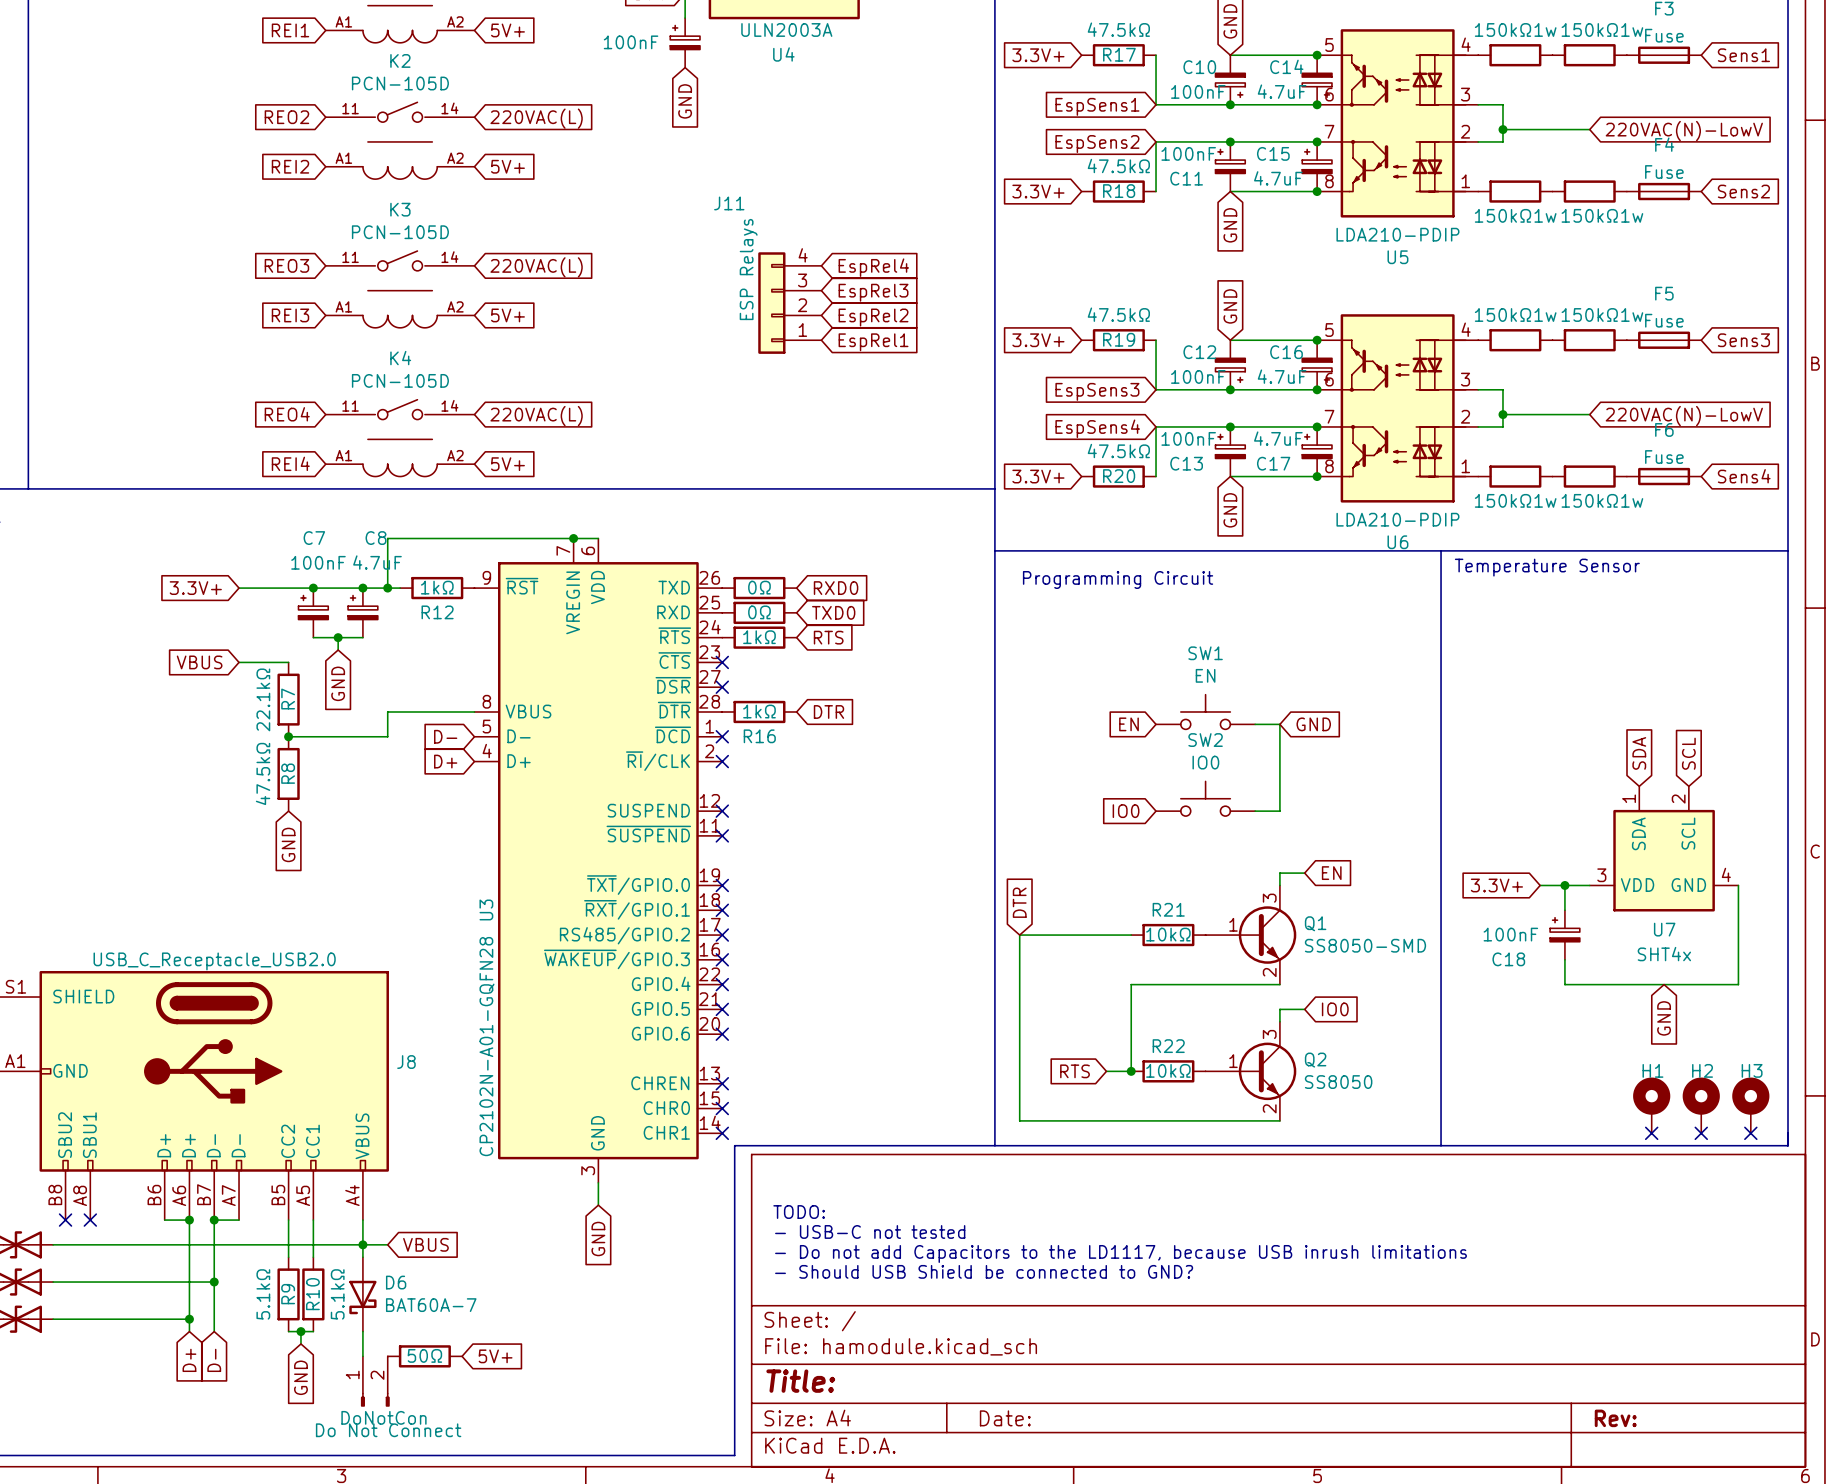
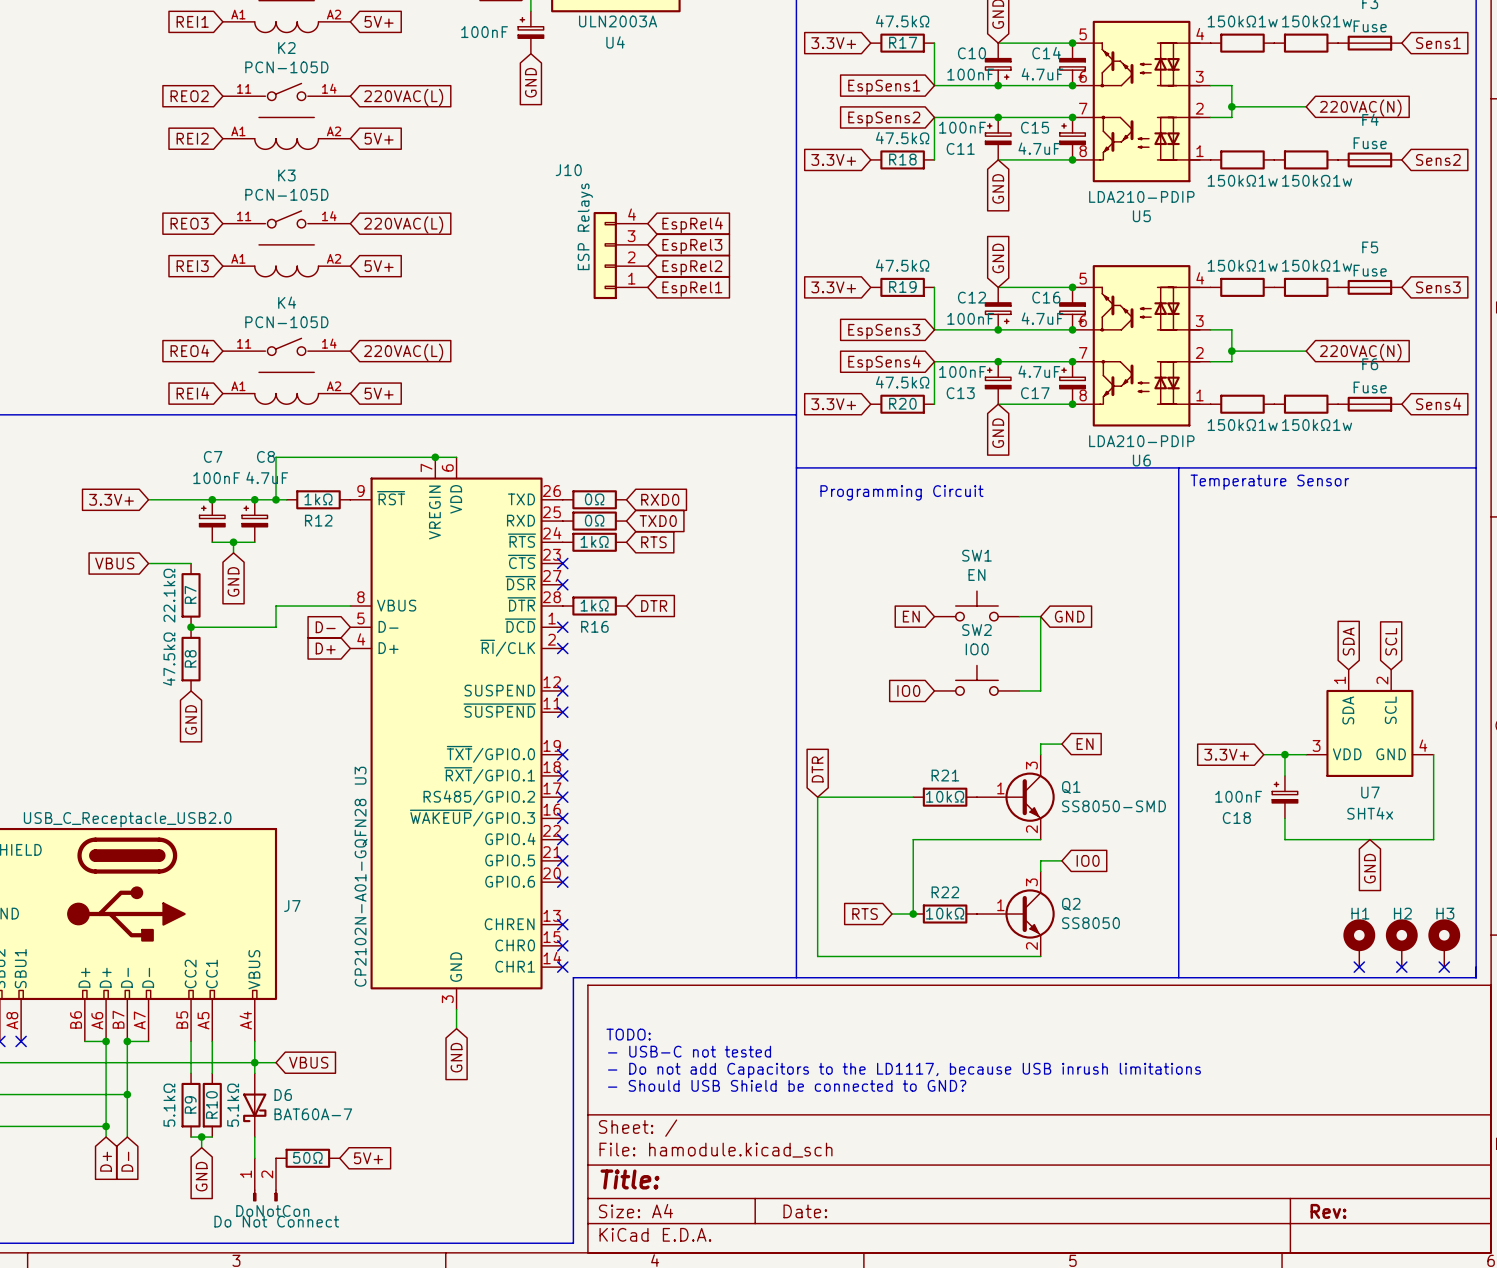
global label: 220VAC(N)-LowV (1684, 131) -> 220VAC(N) (1360, 108)
J11 name: J11 (729, 203) -> J10 (568, 170)
global label: 220VAC(N)-LowV (1684, 416) -> 220VAC(N) (1360, 352)
J8 name: J8 (406, 1062) -> J7 (292, 906)

